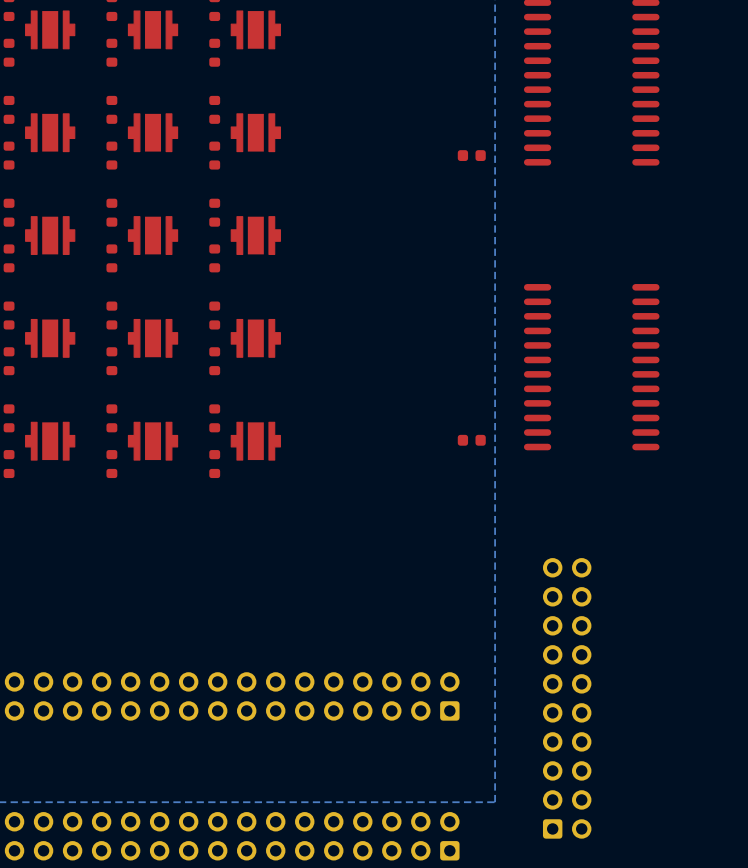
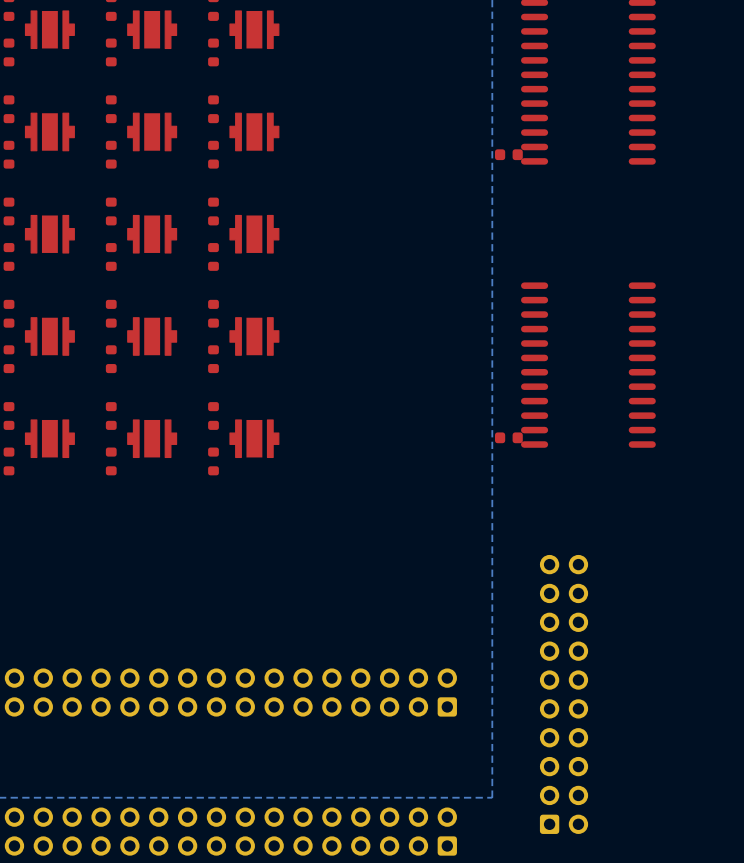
part position: (471, 155) -> (508, 154)
part position: (471, 440) -> (508, 437)

